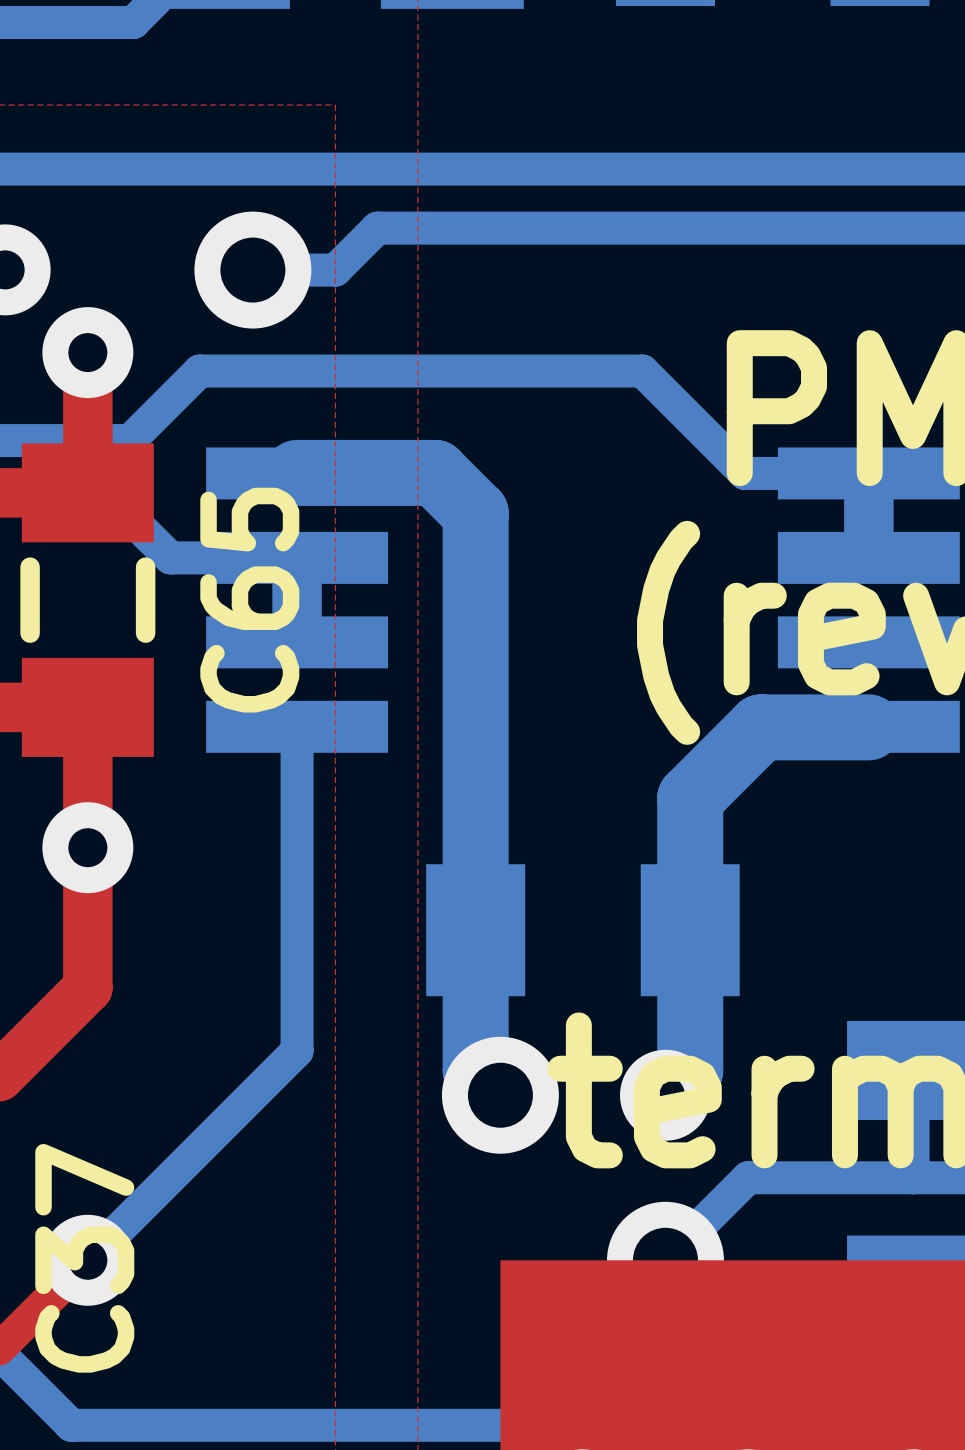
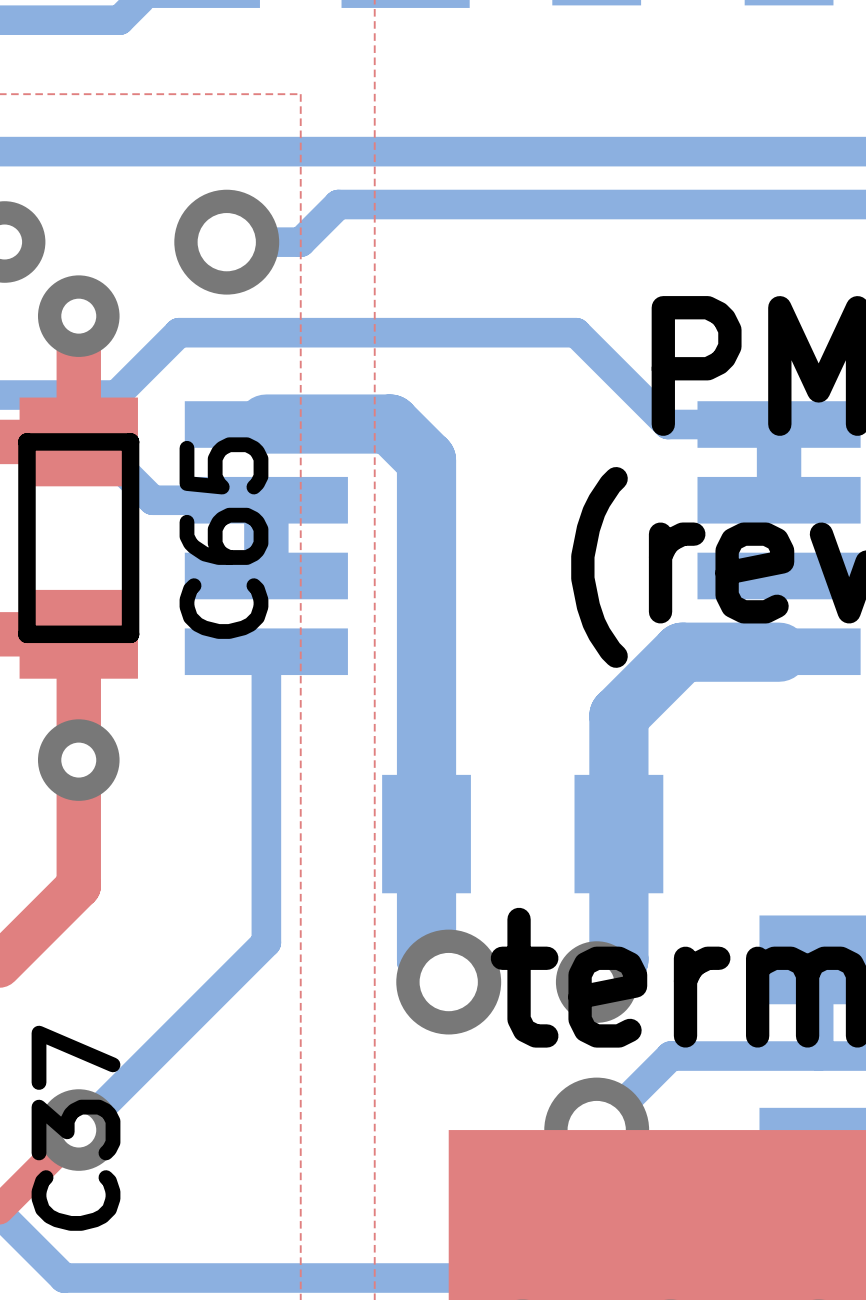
C65 footprint: [20, 443, 156, 757] -> [18, 397, 140, 679]

